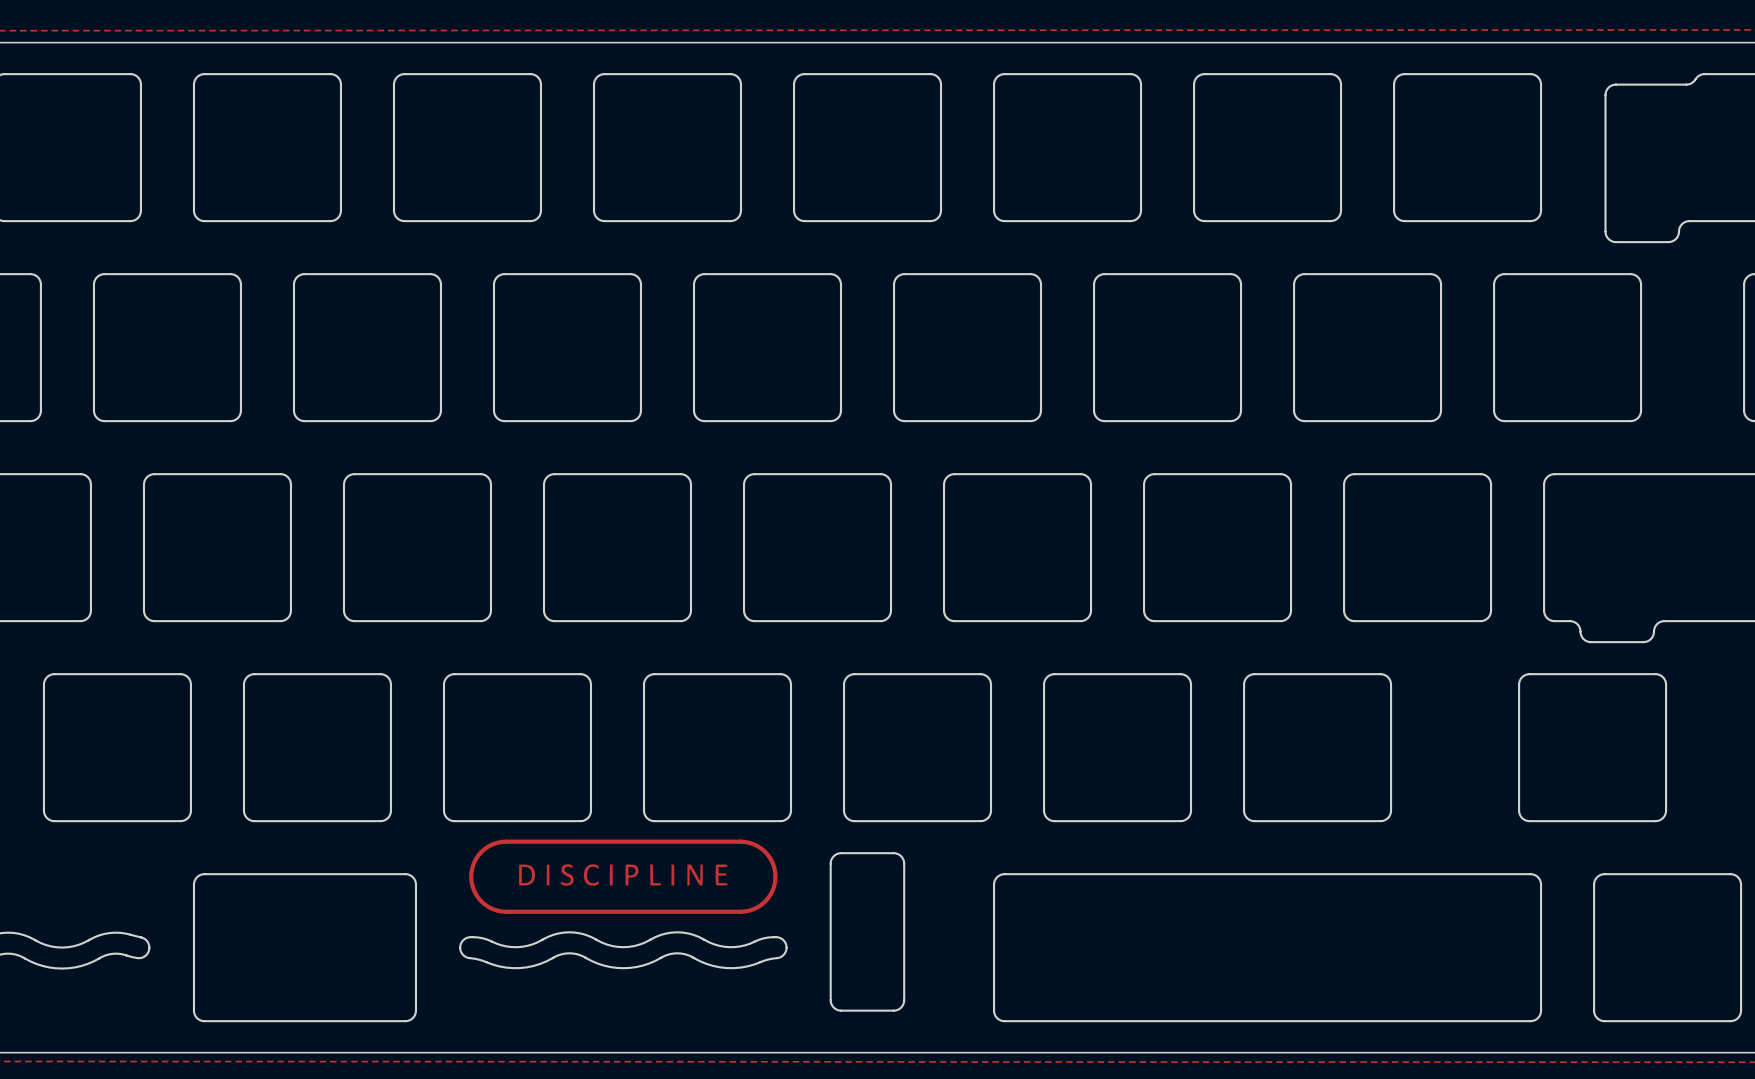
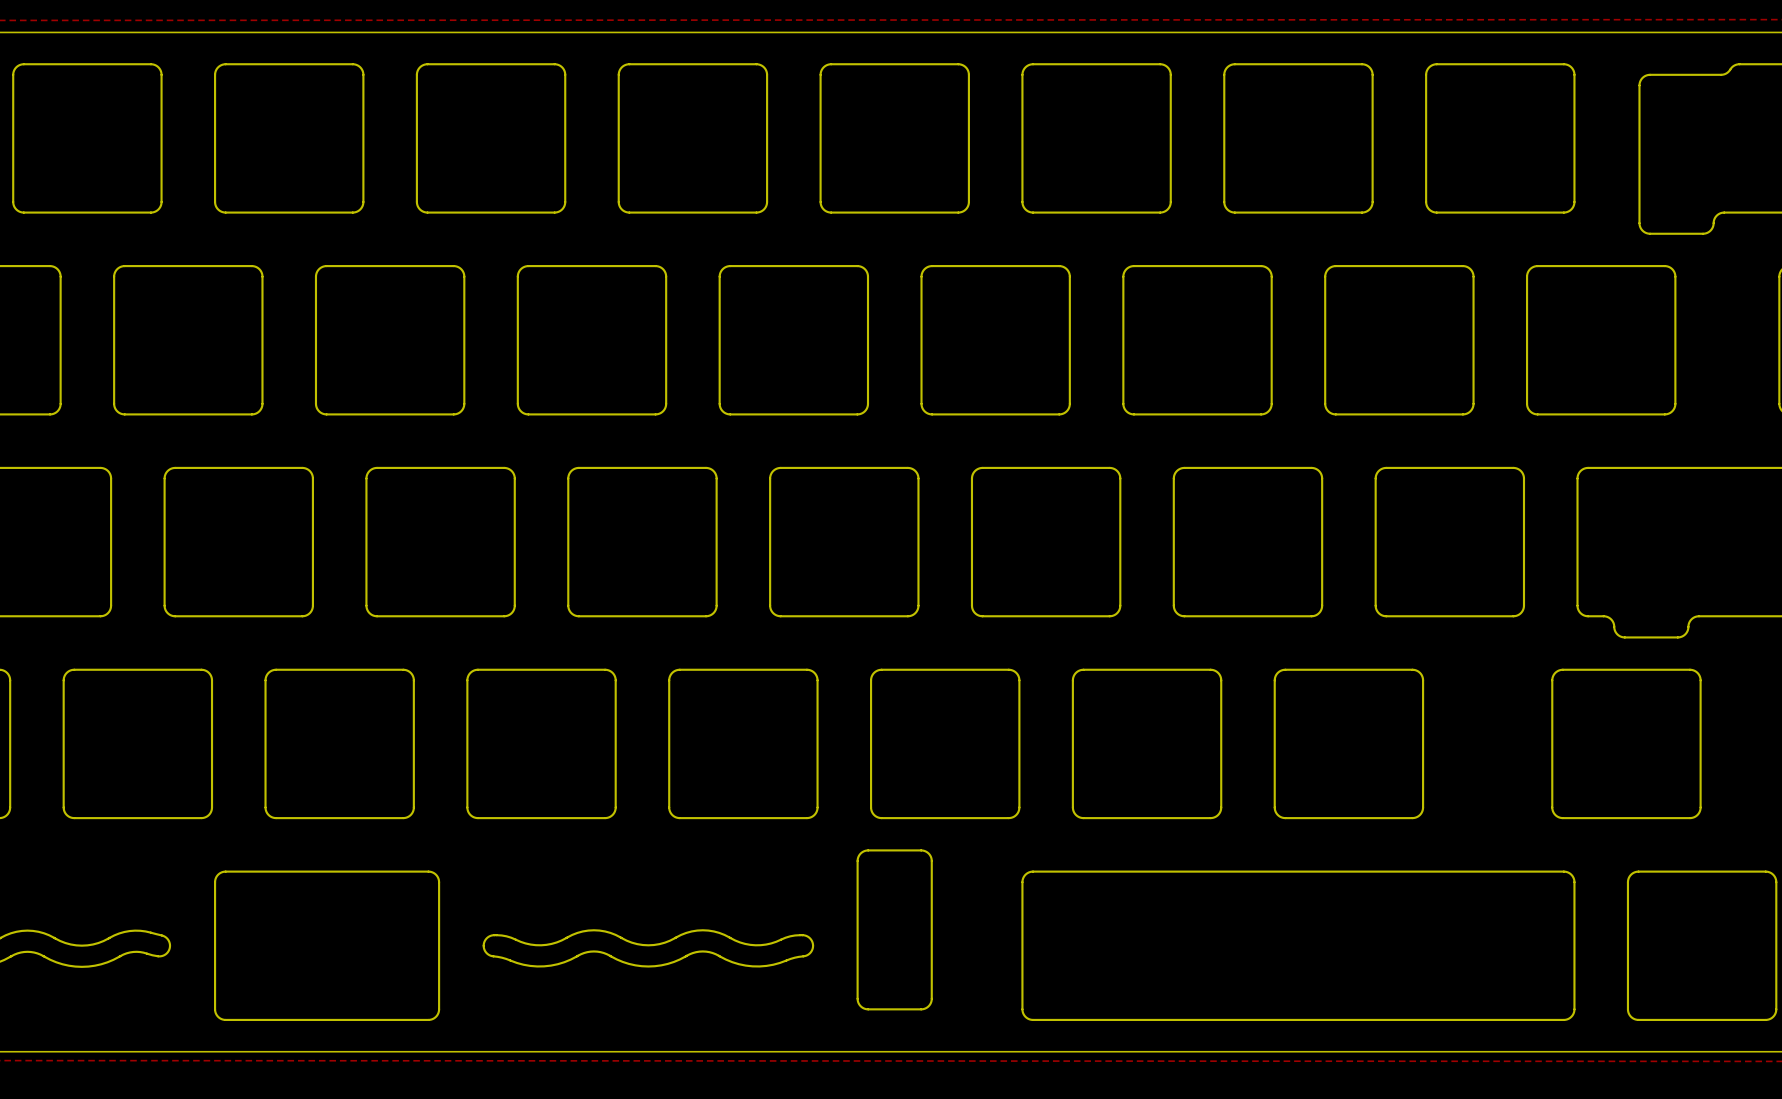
drawing: [469, 839, 778, 914] -> none

